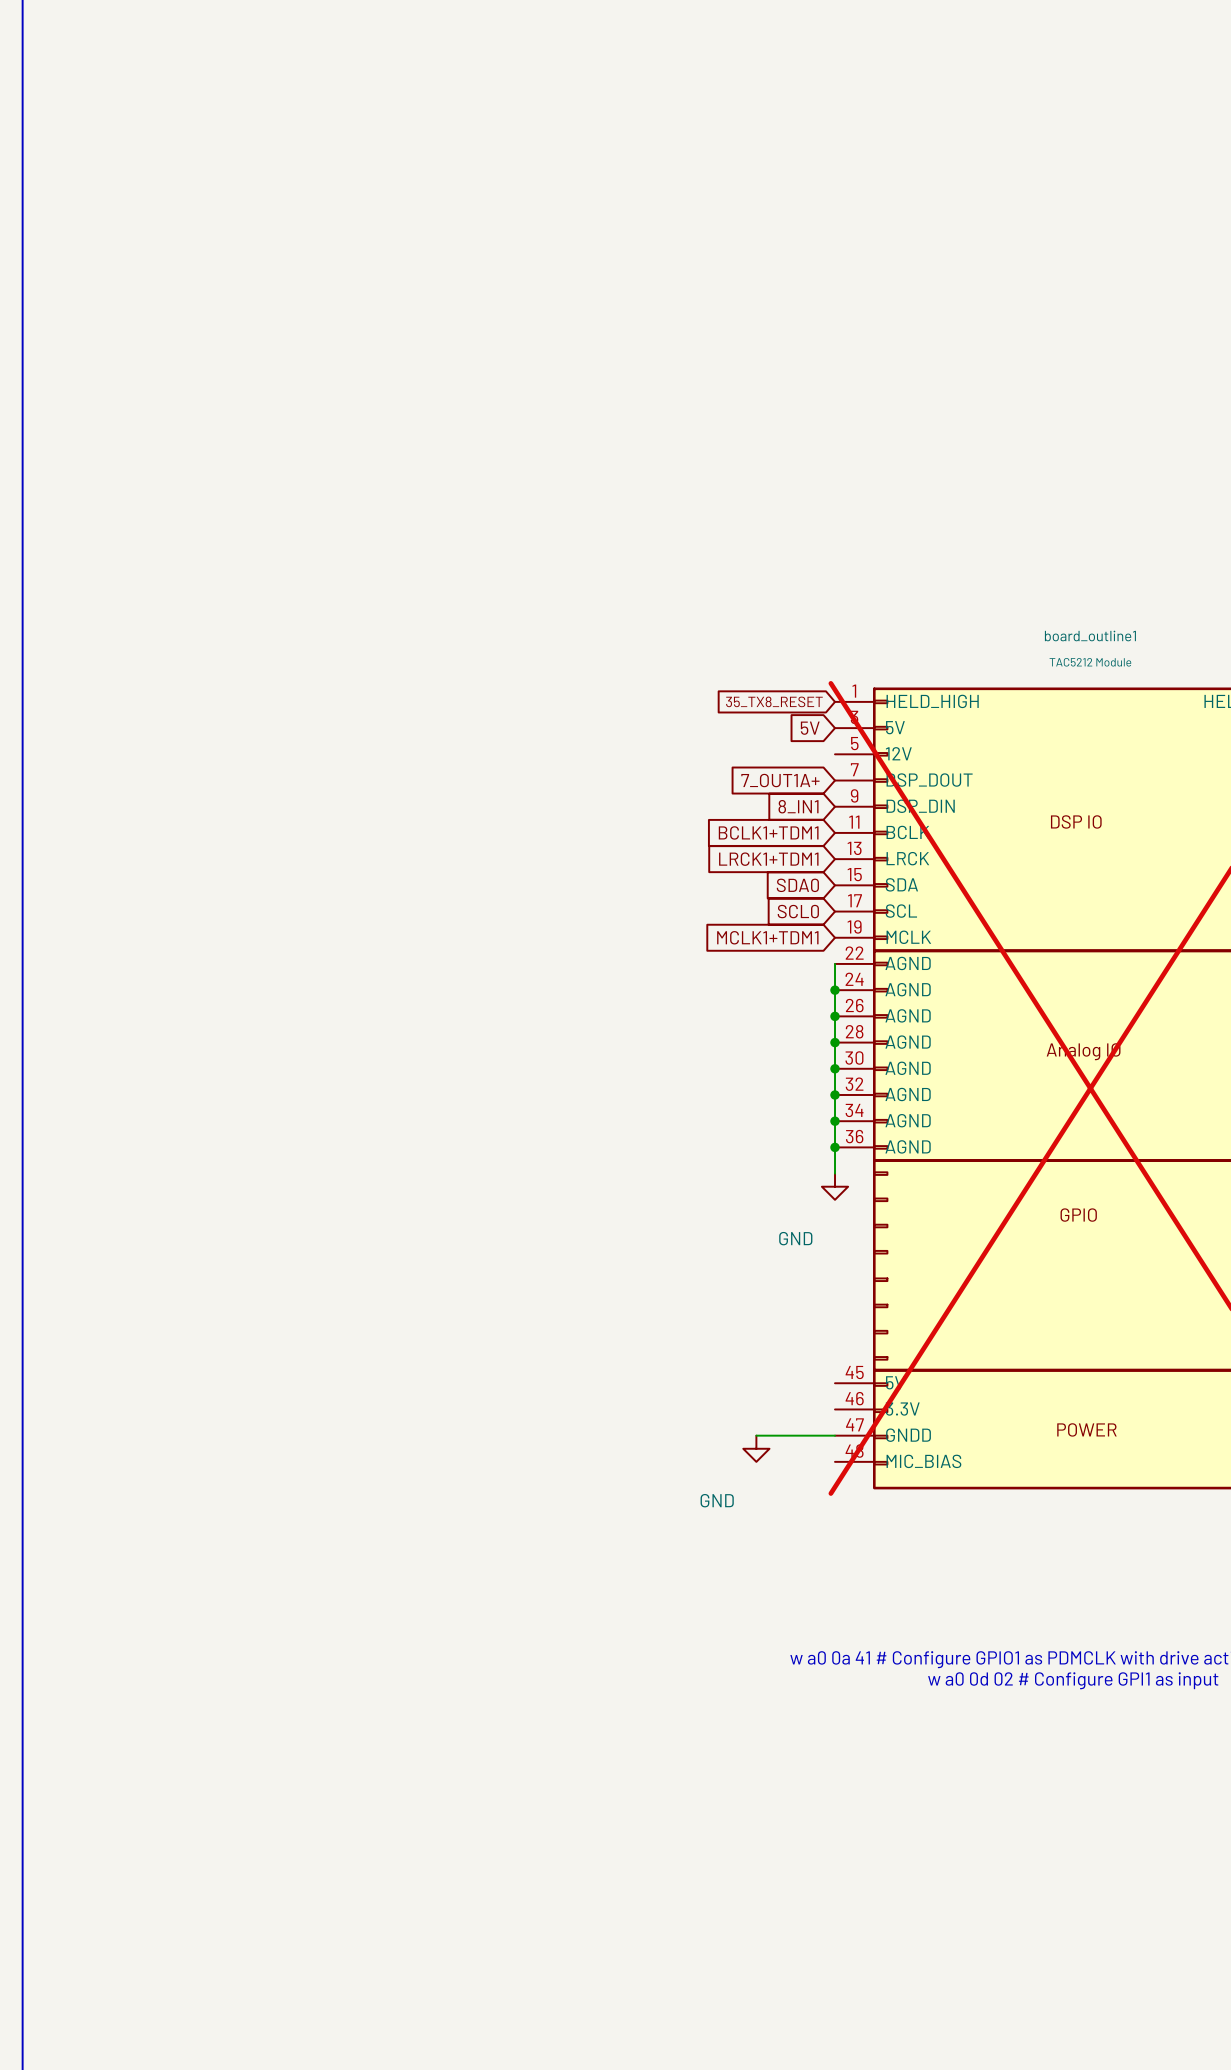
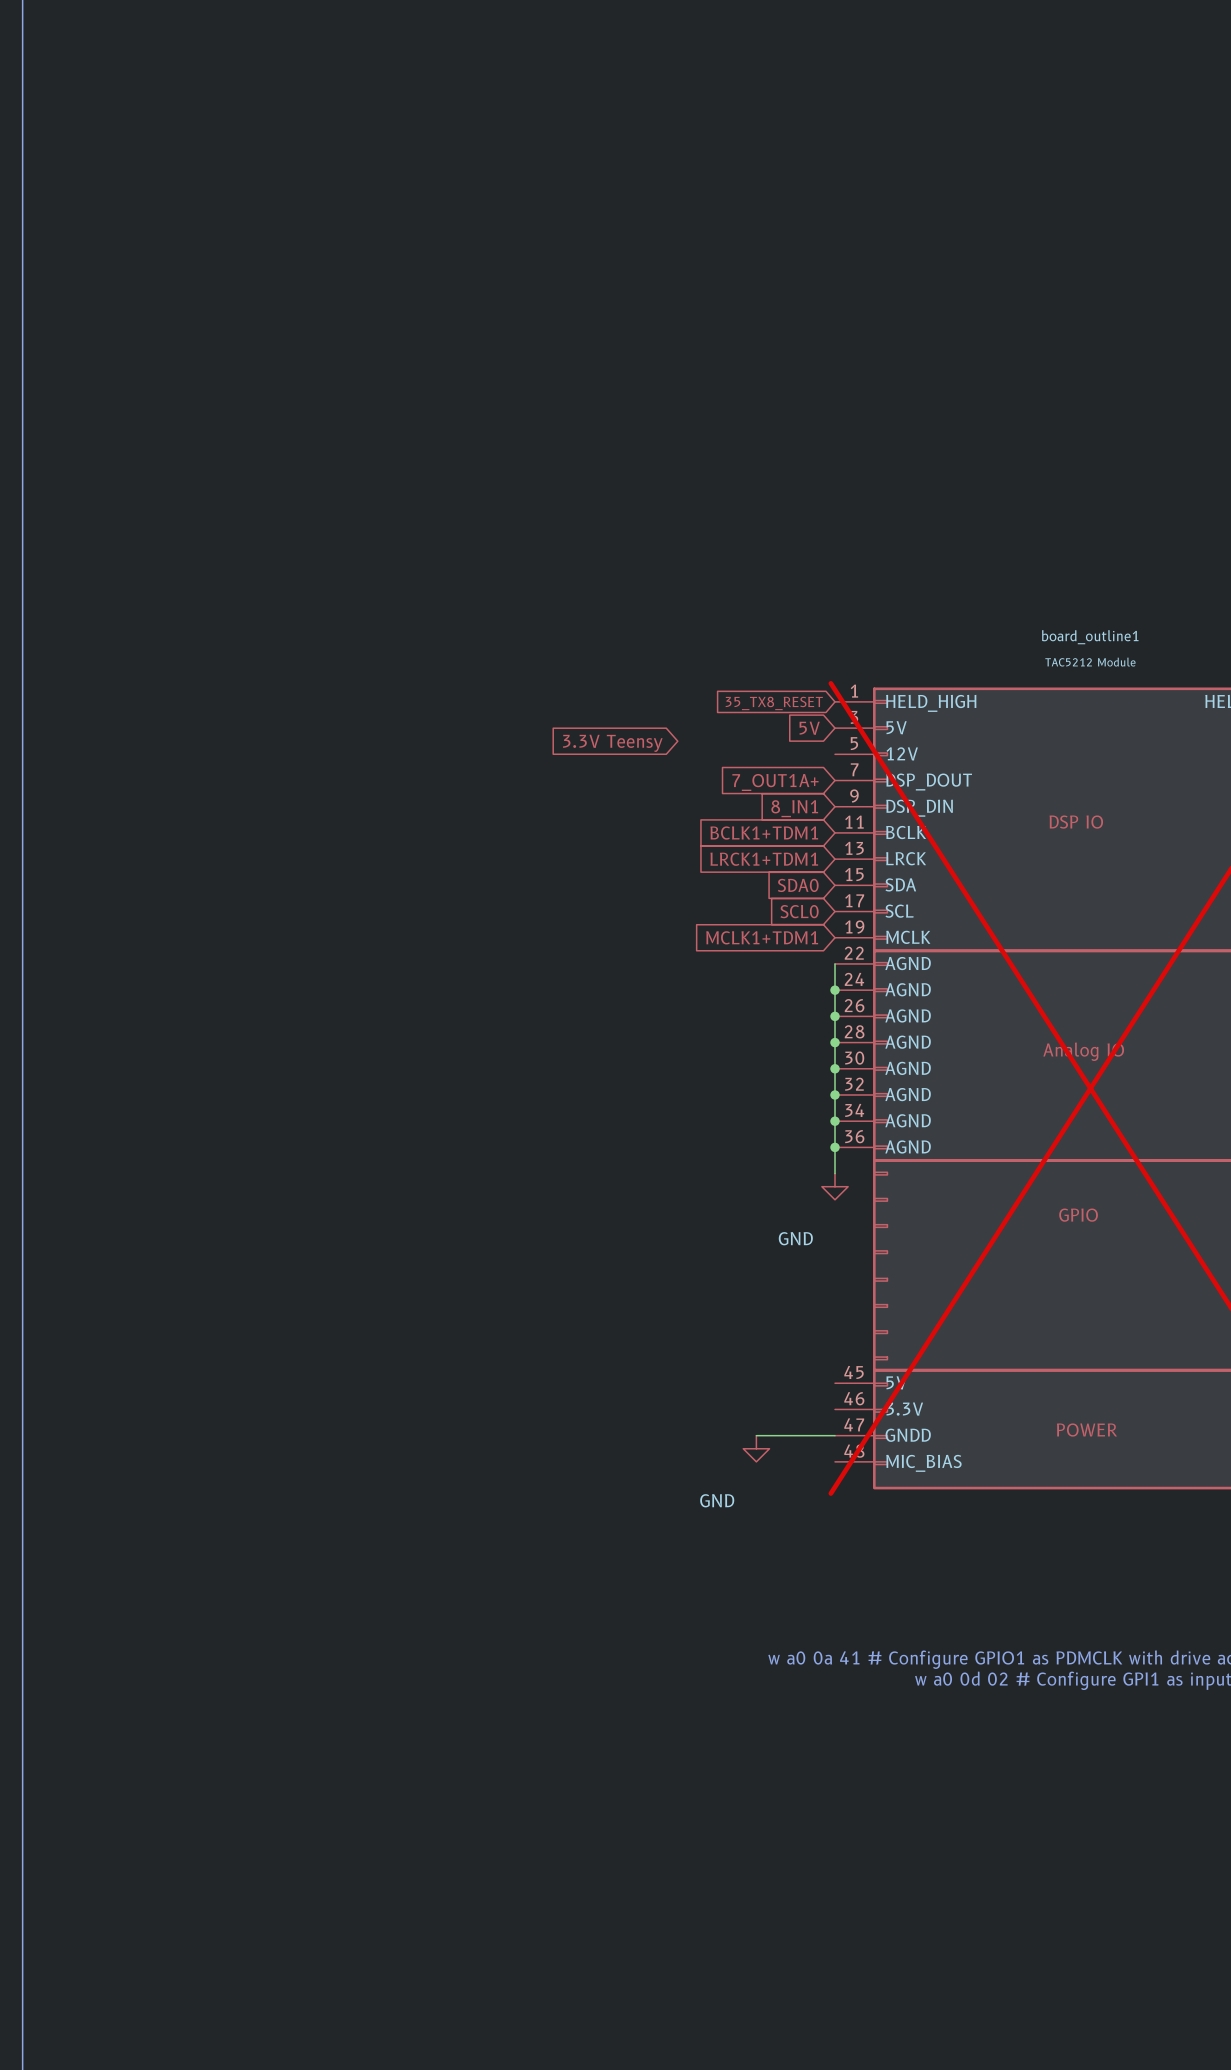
global label: none -> 3.3V Teensy (612, 743)

